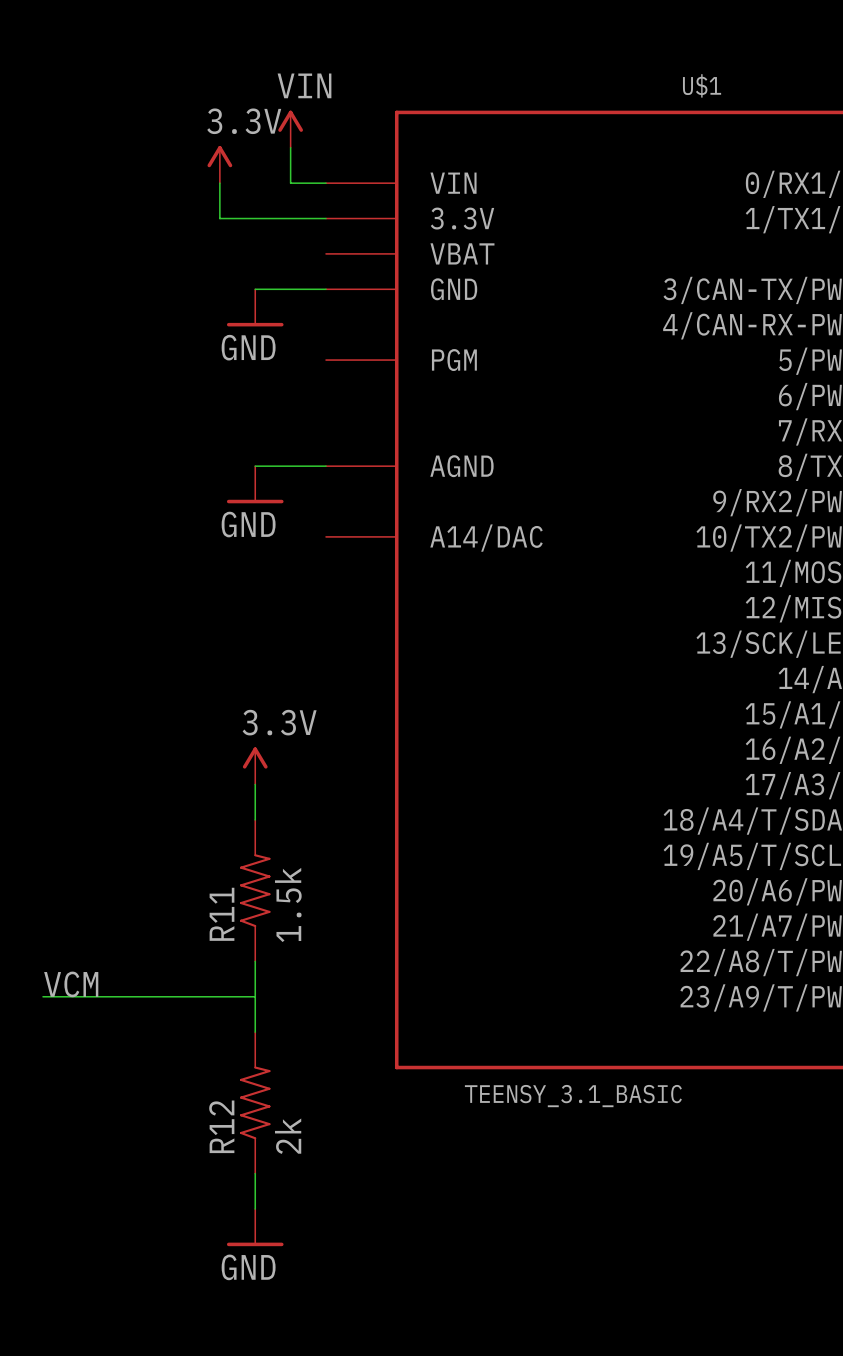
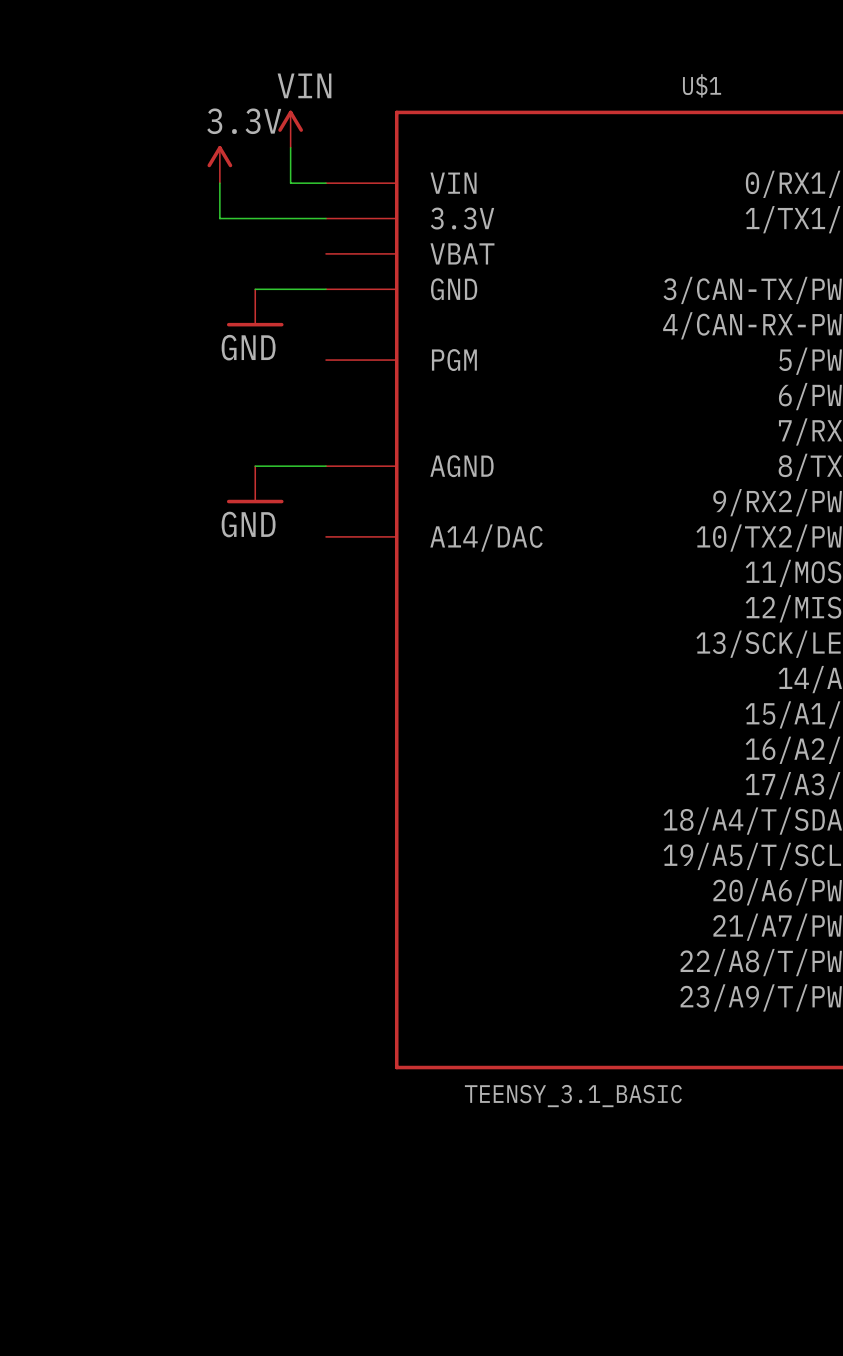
power symbol: 3.3V (255, 765) -> none
wire: (255, 784) (255, 819) -> none
R11: 1.5k (255, 890) -> none
wire: (255, 961) (255, 1032) -> none
label: VCM (71, 984) -> none
wire: (43, 996) (255, 996) -> none
R12: 2k (255, 1102) -> none
wire: (255, 1173) (255, 1209) -> none
power symbol: GND (255, 1227) -> none

